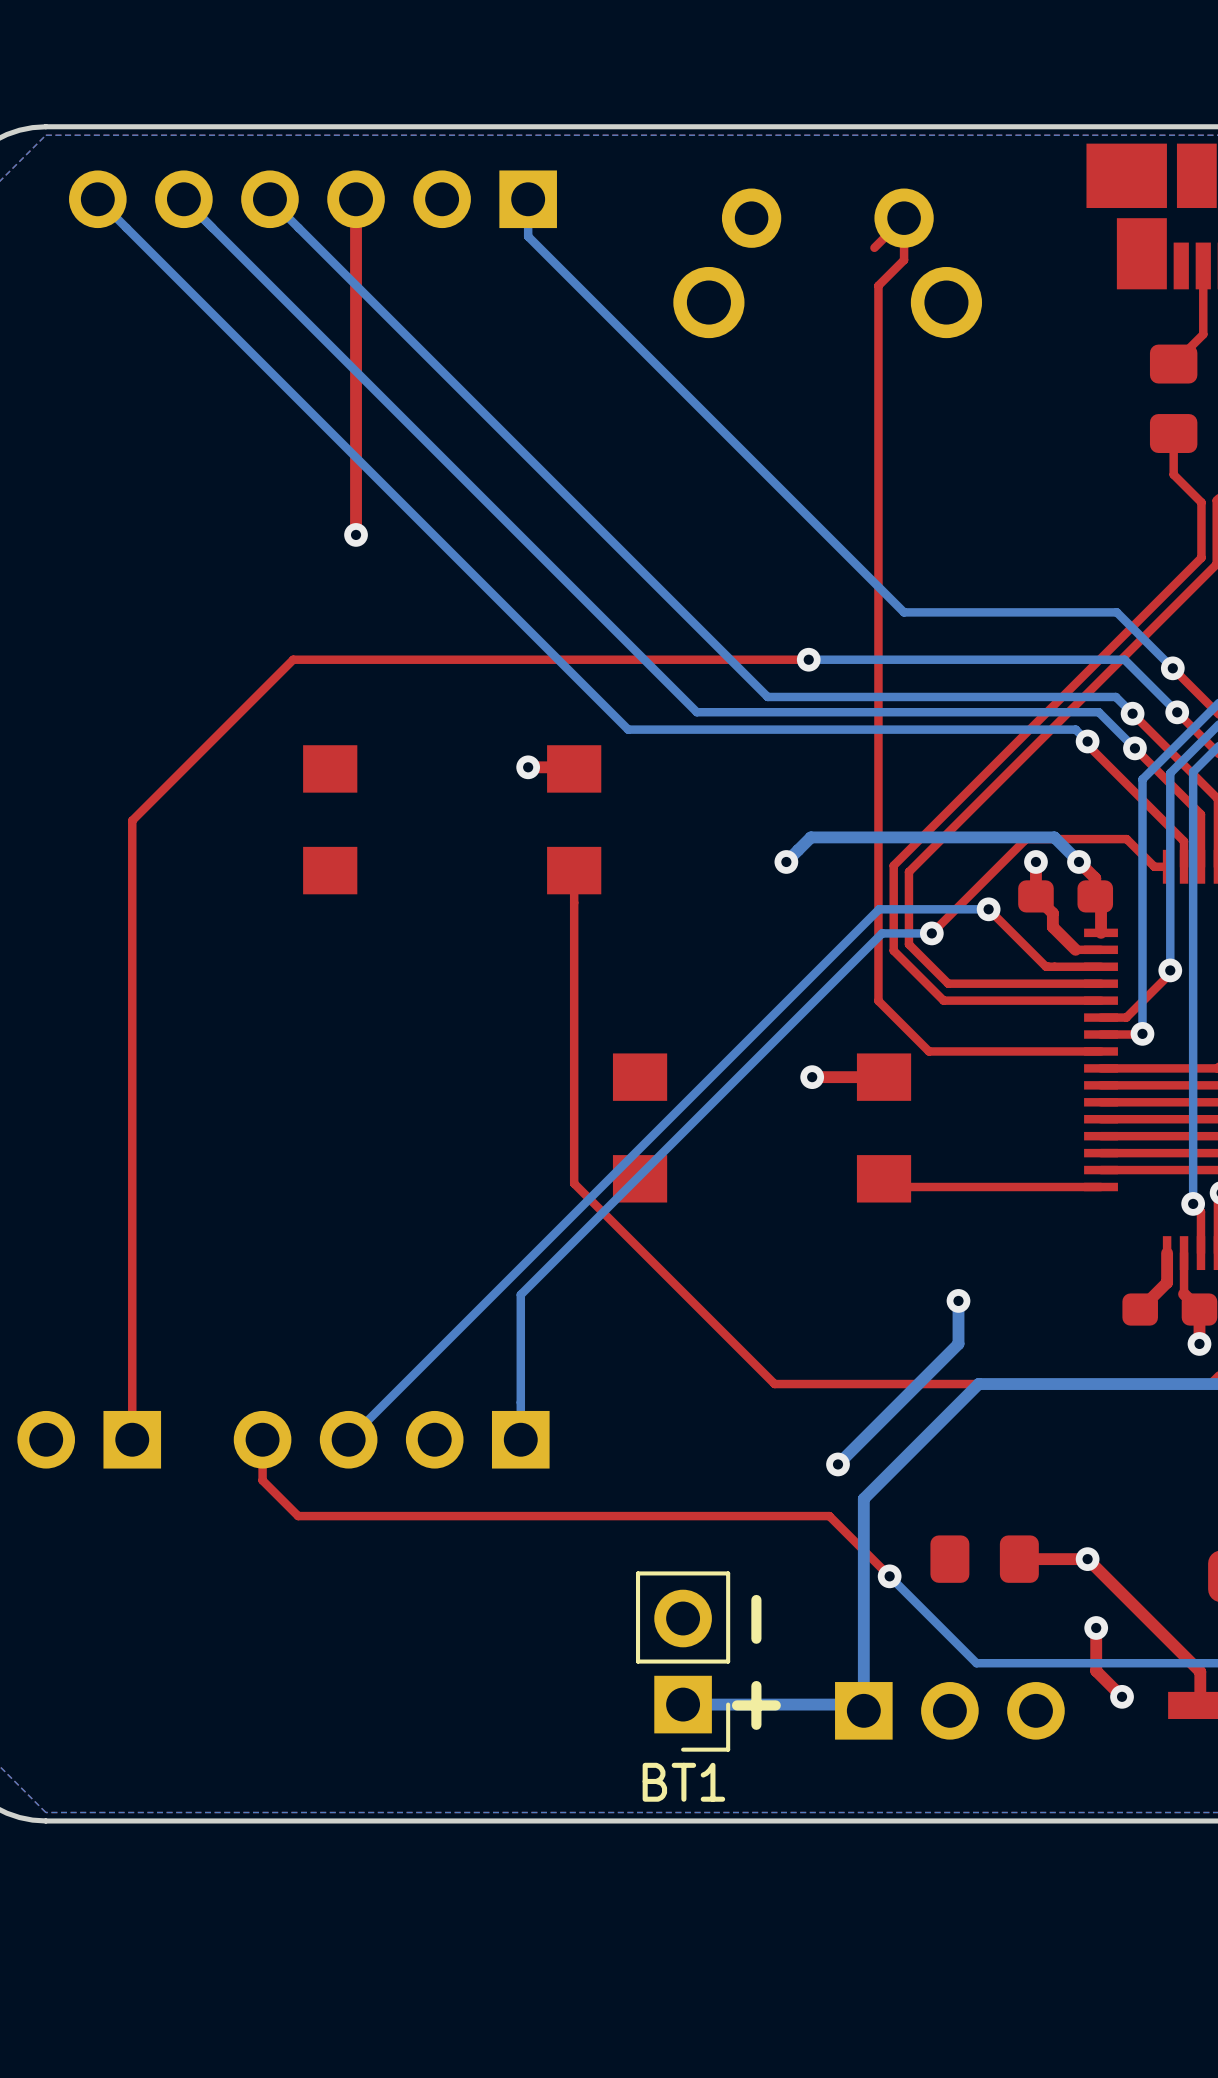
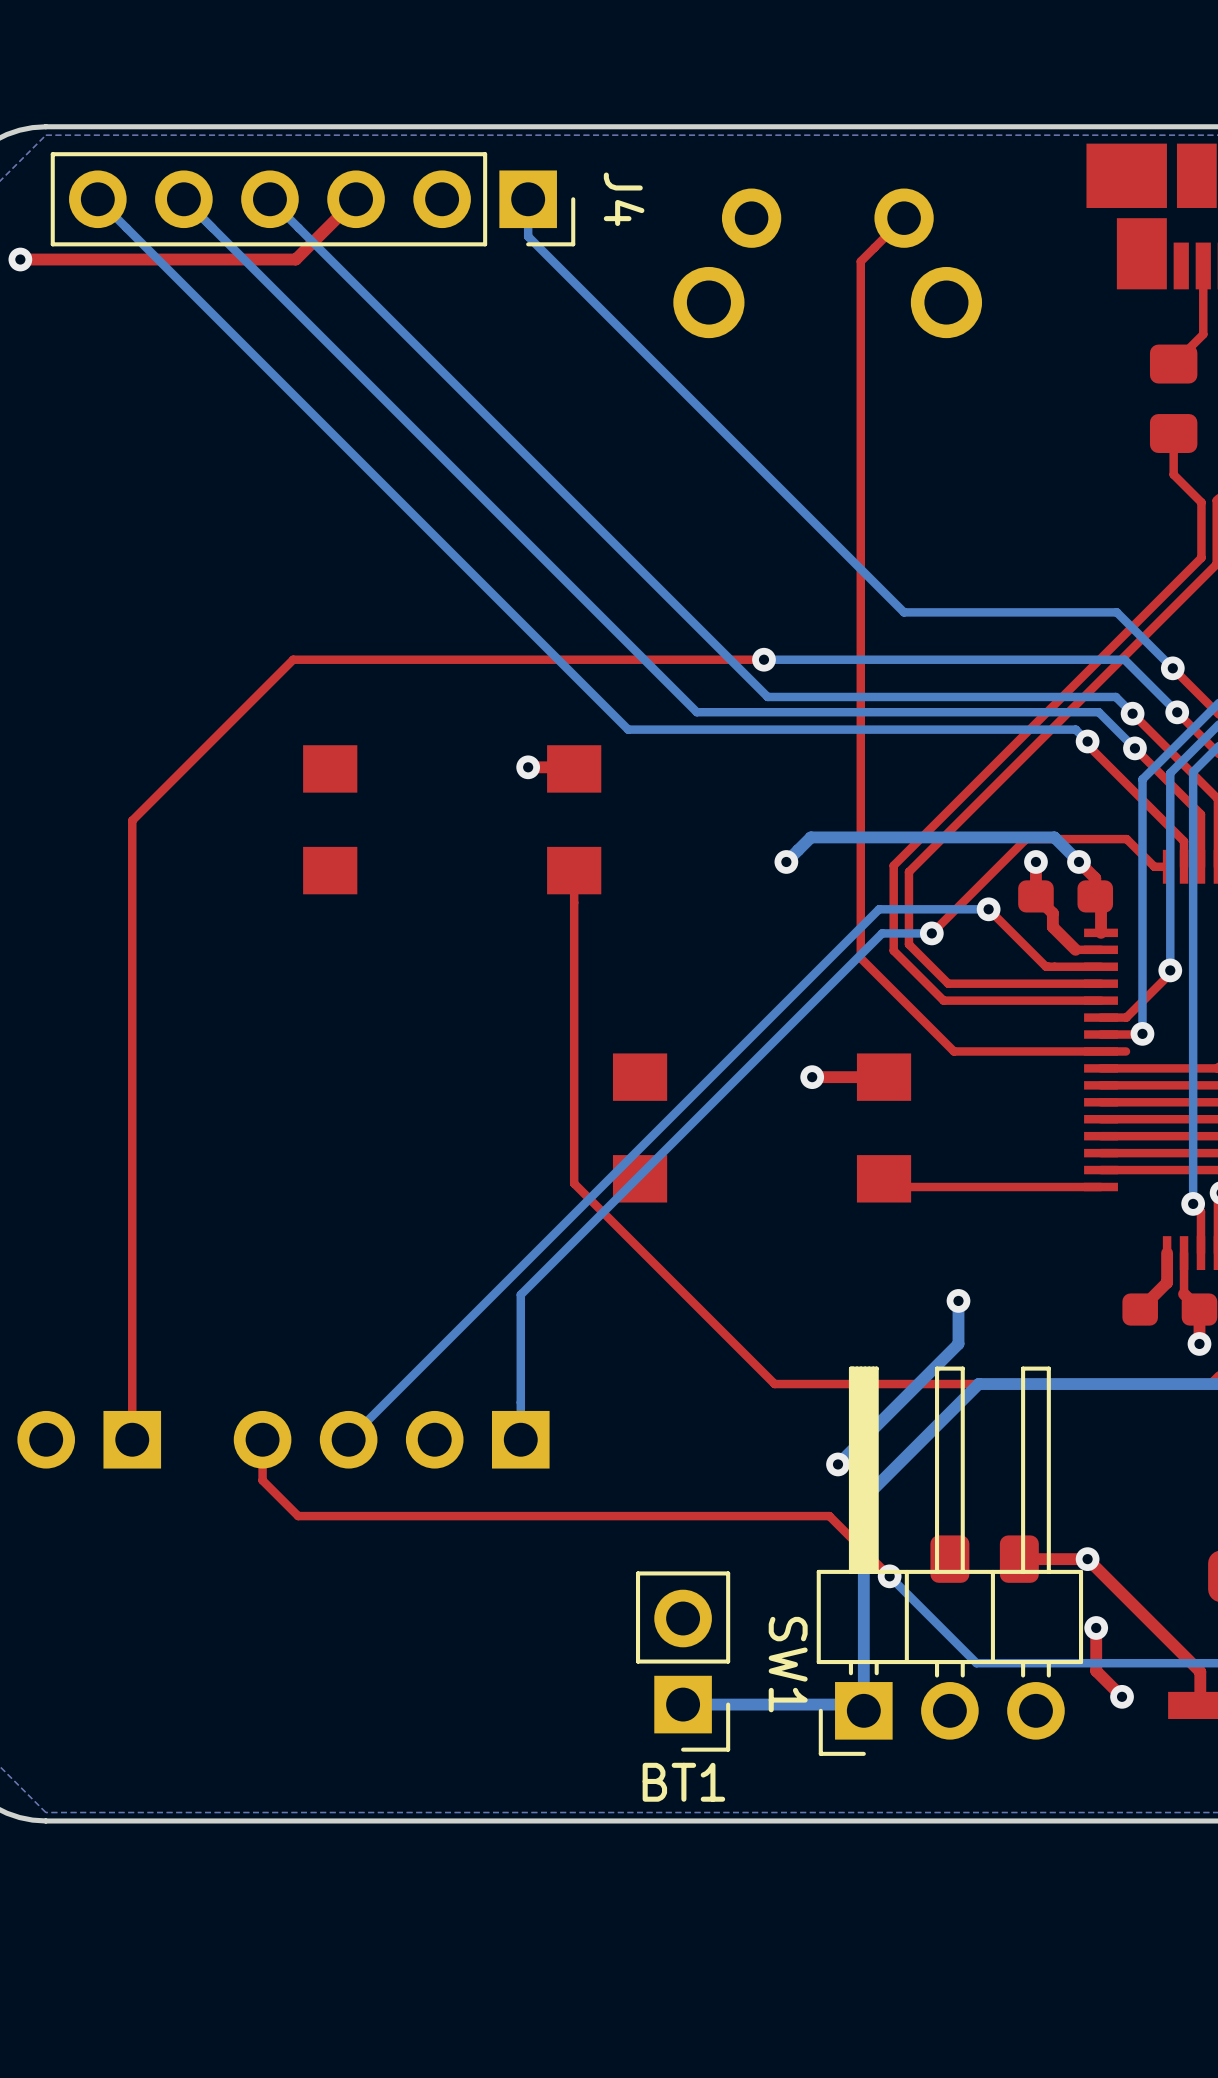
J4 side: top (313, 199) -> bottom (313, 199)
top track: (356, 199) (356, 534) -> (356, 199) (295, 259) (20, 259)
top track: (904, 218) (904, 260) (878, 285) (878, 1000) (928, 1051) (953, 1051) -> (874, 247) (860, 261) (860, 958) (953, 1051)
via: none -> (20, 259)
via: (356, 534) -> none
bottom track: none -> (808, 659) (763, 659)
top track: (808, 659) (763, 659) -> none
via position: (808, 659) -> (763, 659)
top track: none -> (1125, 1051) (1101, 1051)
text: - (756, 1619) -> none
text: + (756, 1705) -> none
SW1 side: top (949, 1710) -> bottom (949, 1561)

